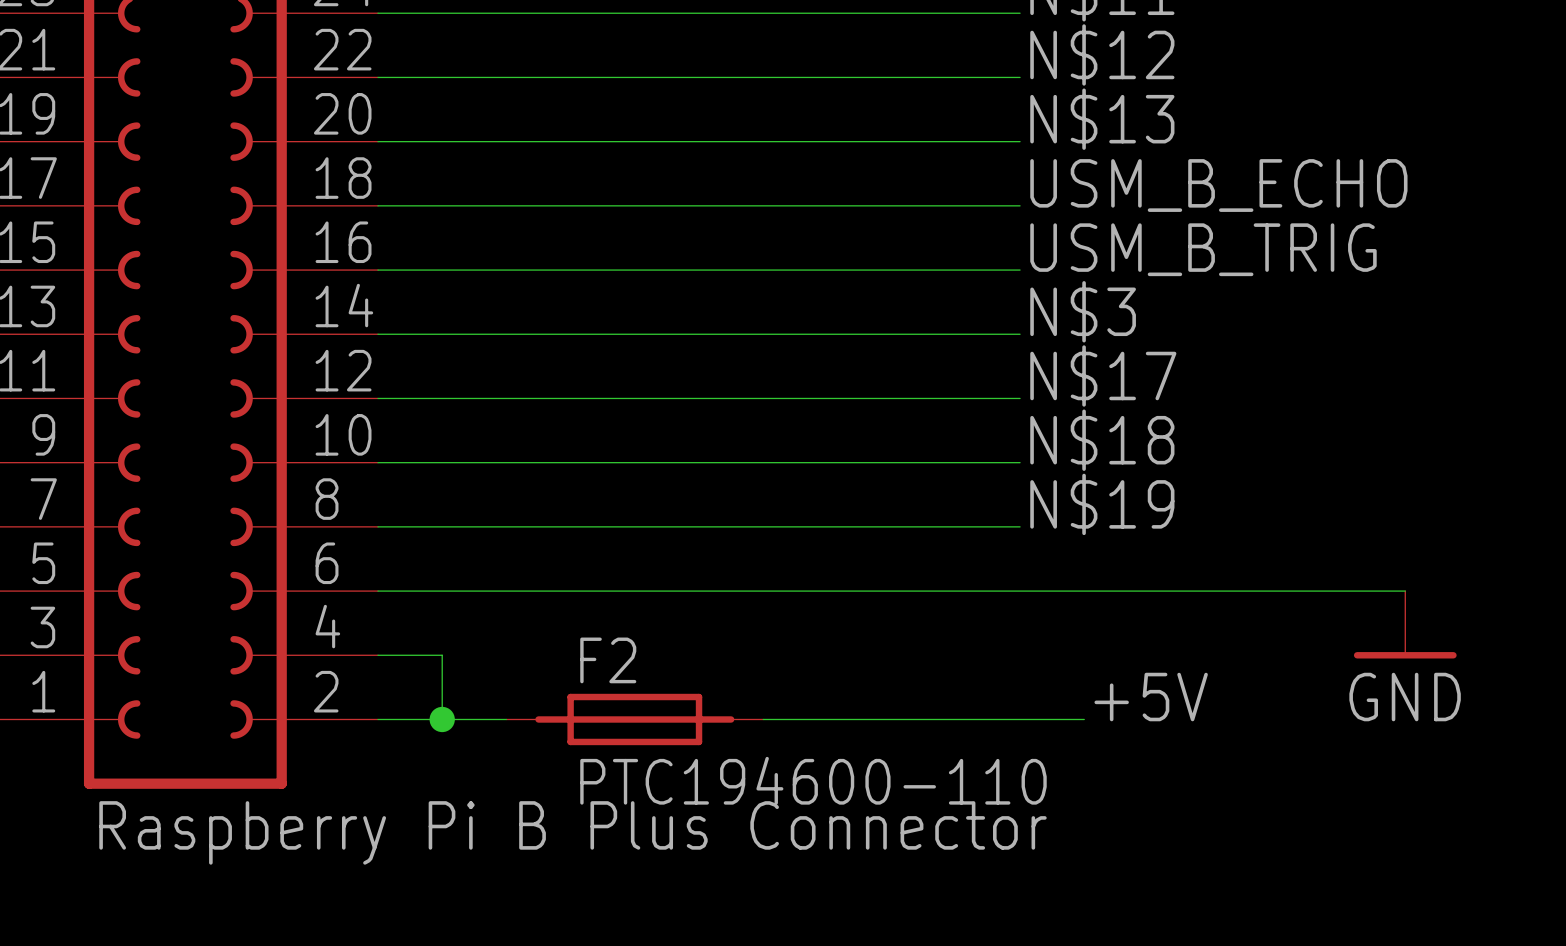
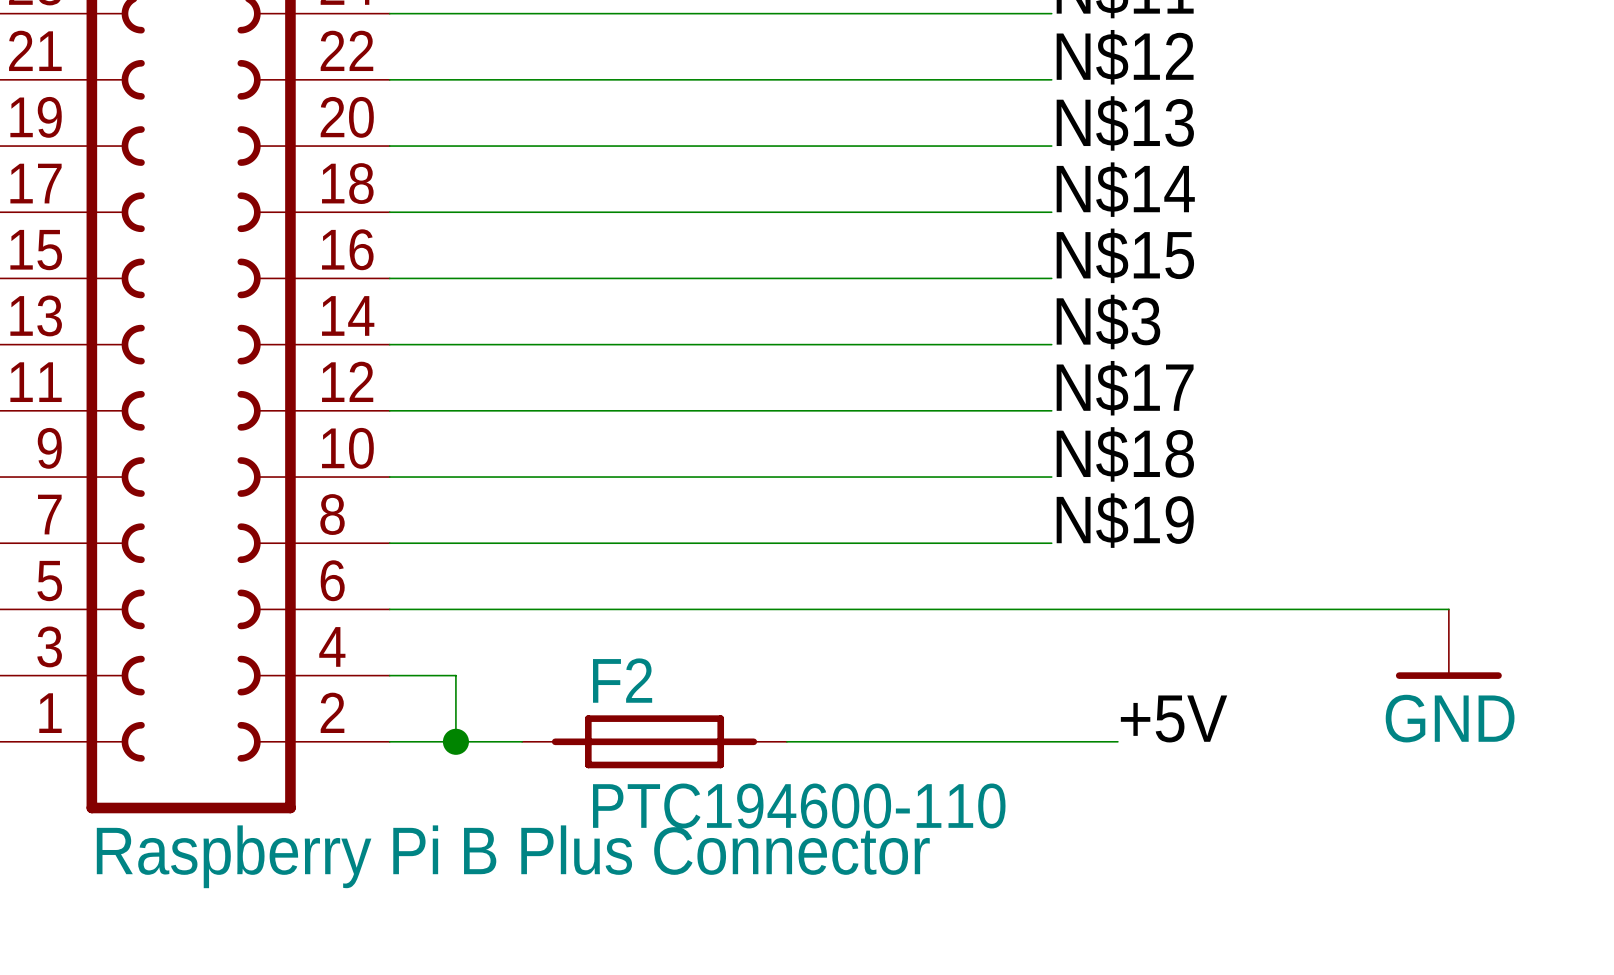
label: USM_B_ECHO (1218, 185) -> N$14 (1125, 189)
label: USM_B_TRIG (1203, 249) -> N$15 (1125, 255)

